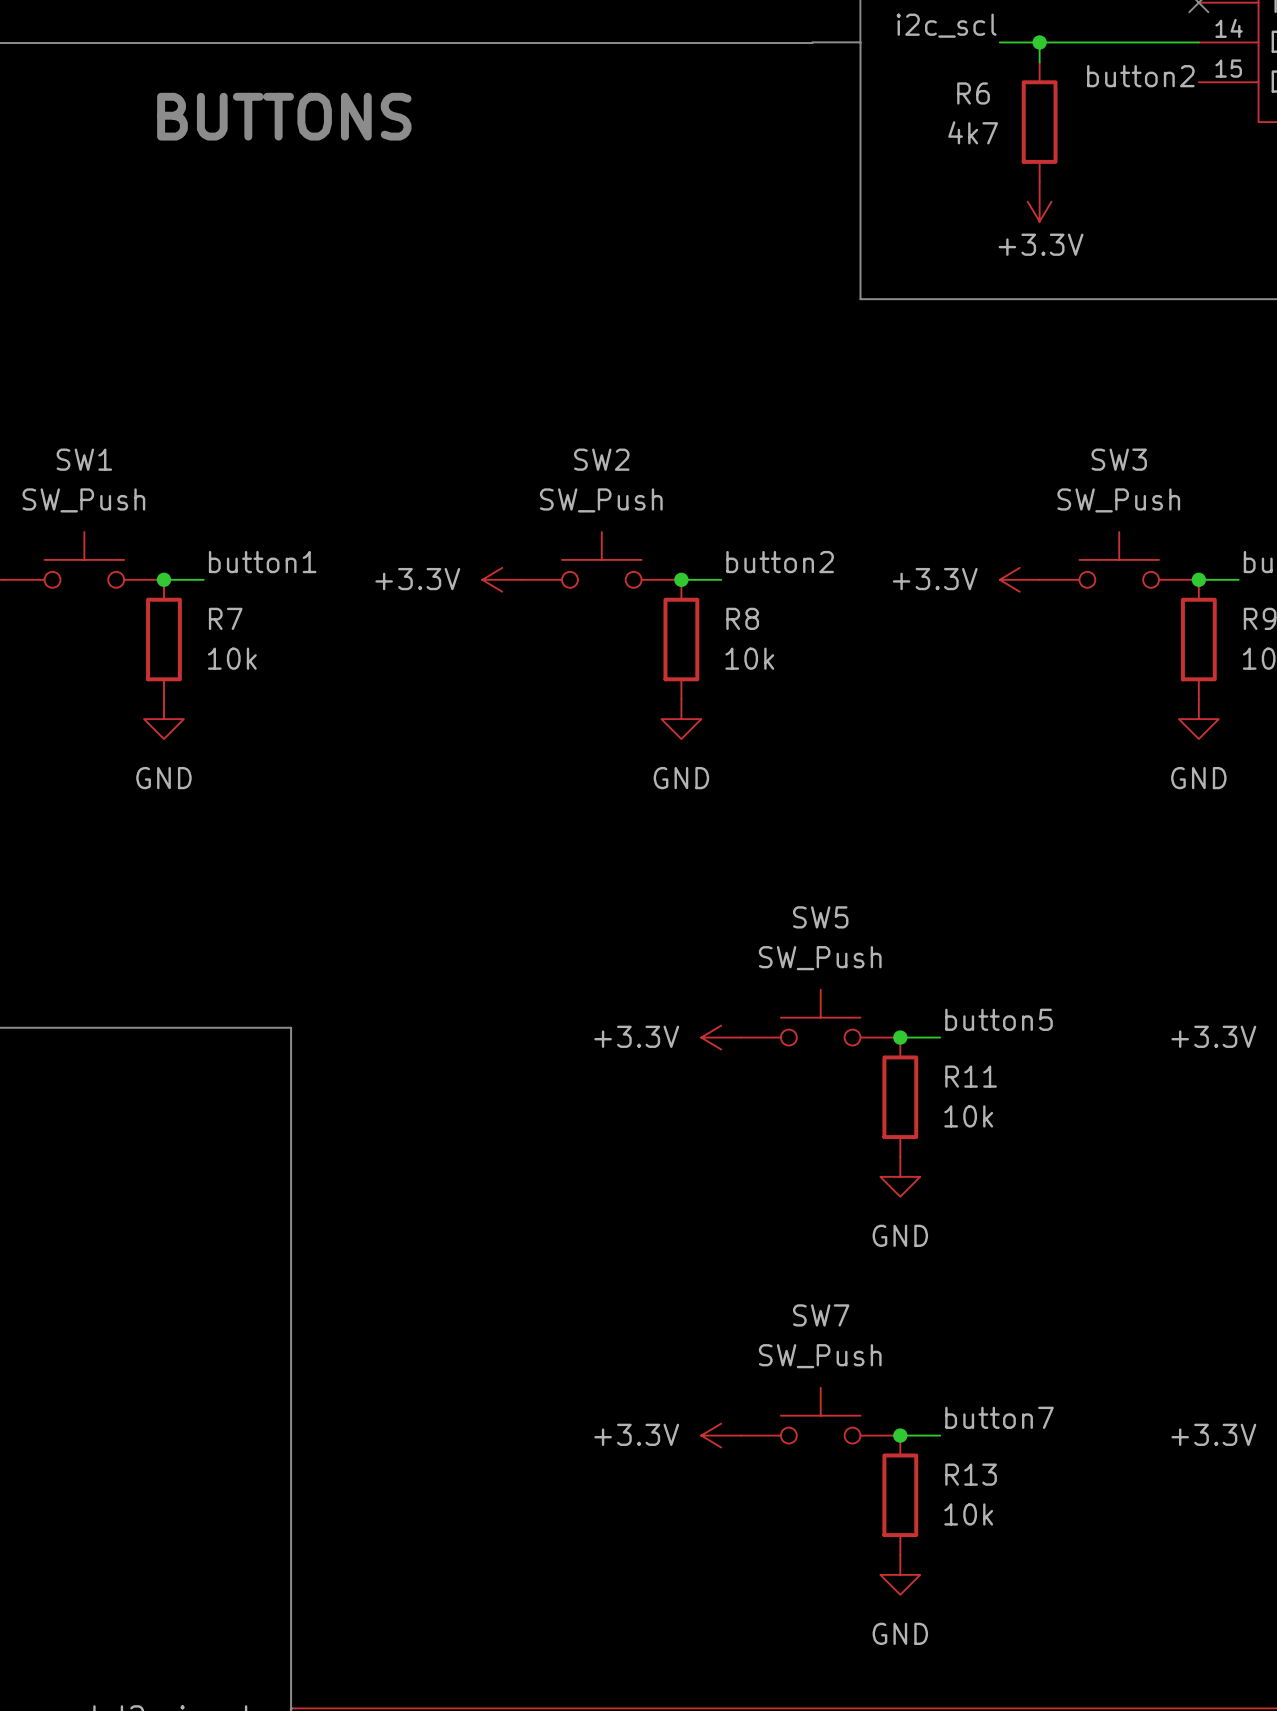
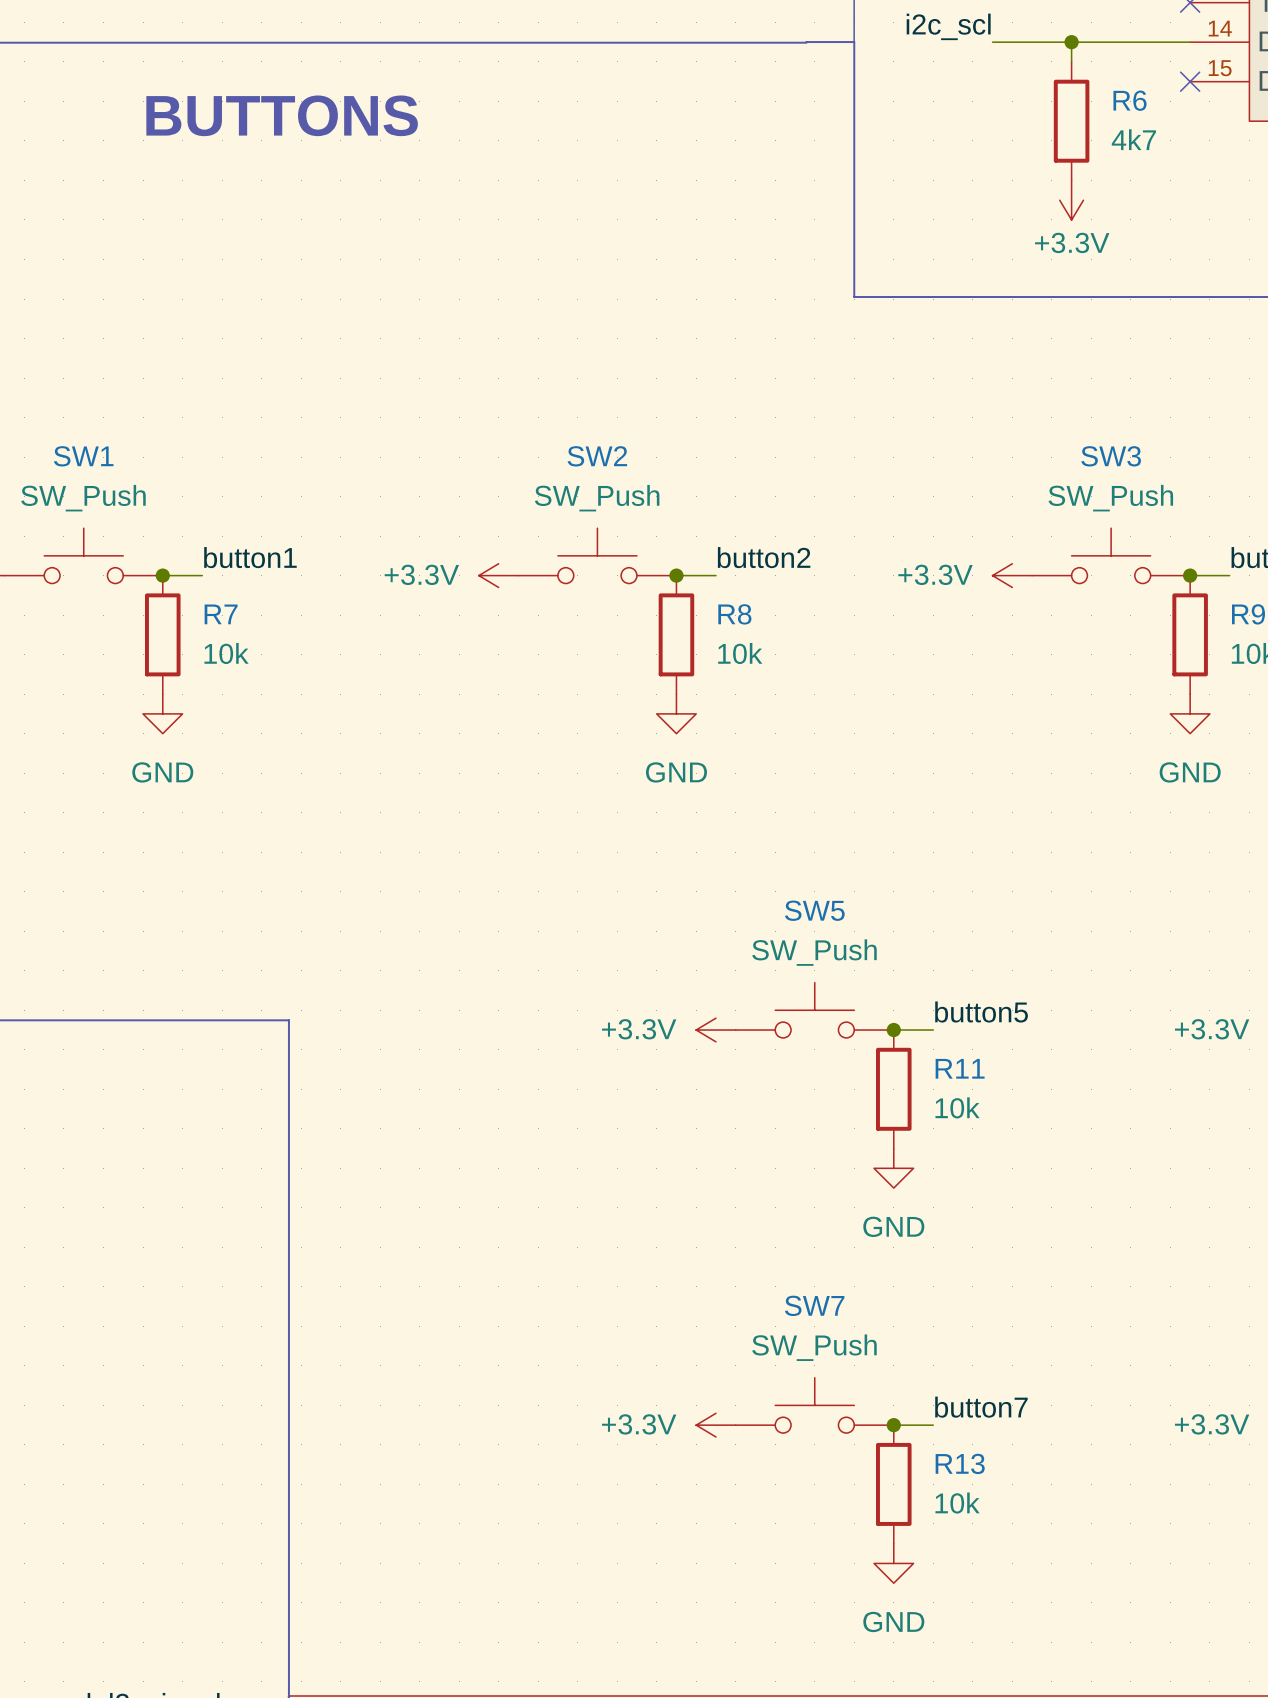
wire: (1039, 42) (1039, 62) -> (1071, 42) (1071, 61)
junction position: (1039, 42) -> (1071, 42)
label: button2 (1140, 76) -> none
no-connect mark: none -> (1190, 81)
R6 name position: R6 (973, 93) -> R6 (1130, 100)
R6 position: (1039, 122) -> (1071, 121)
R6 value position: 4k7 (973, 132) -> 4k7 (1133, 139)
power symbol position: +3.3V (1039, 201) -> +3.3V (1071, 200)

